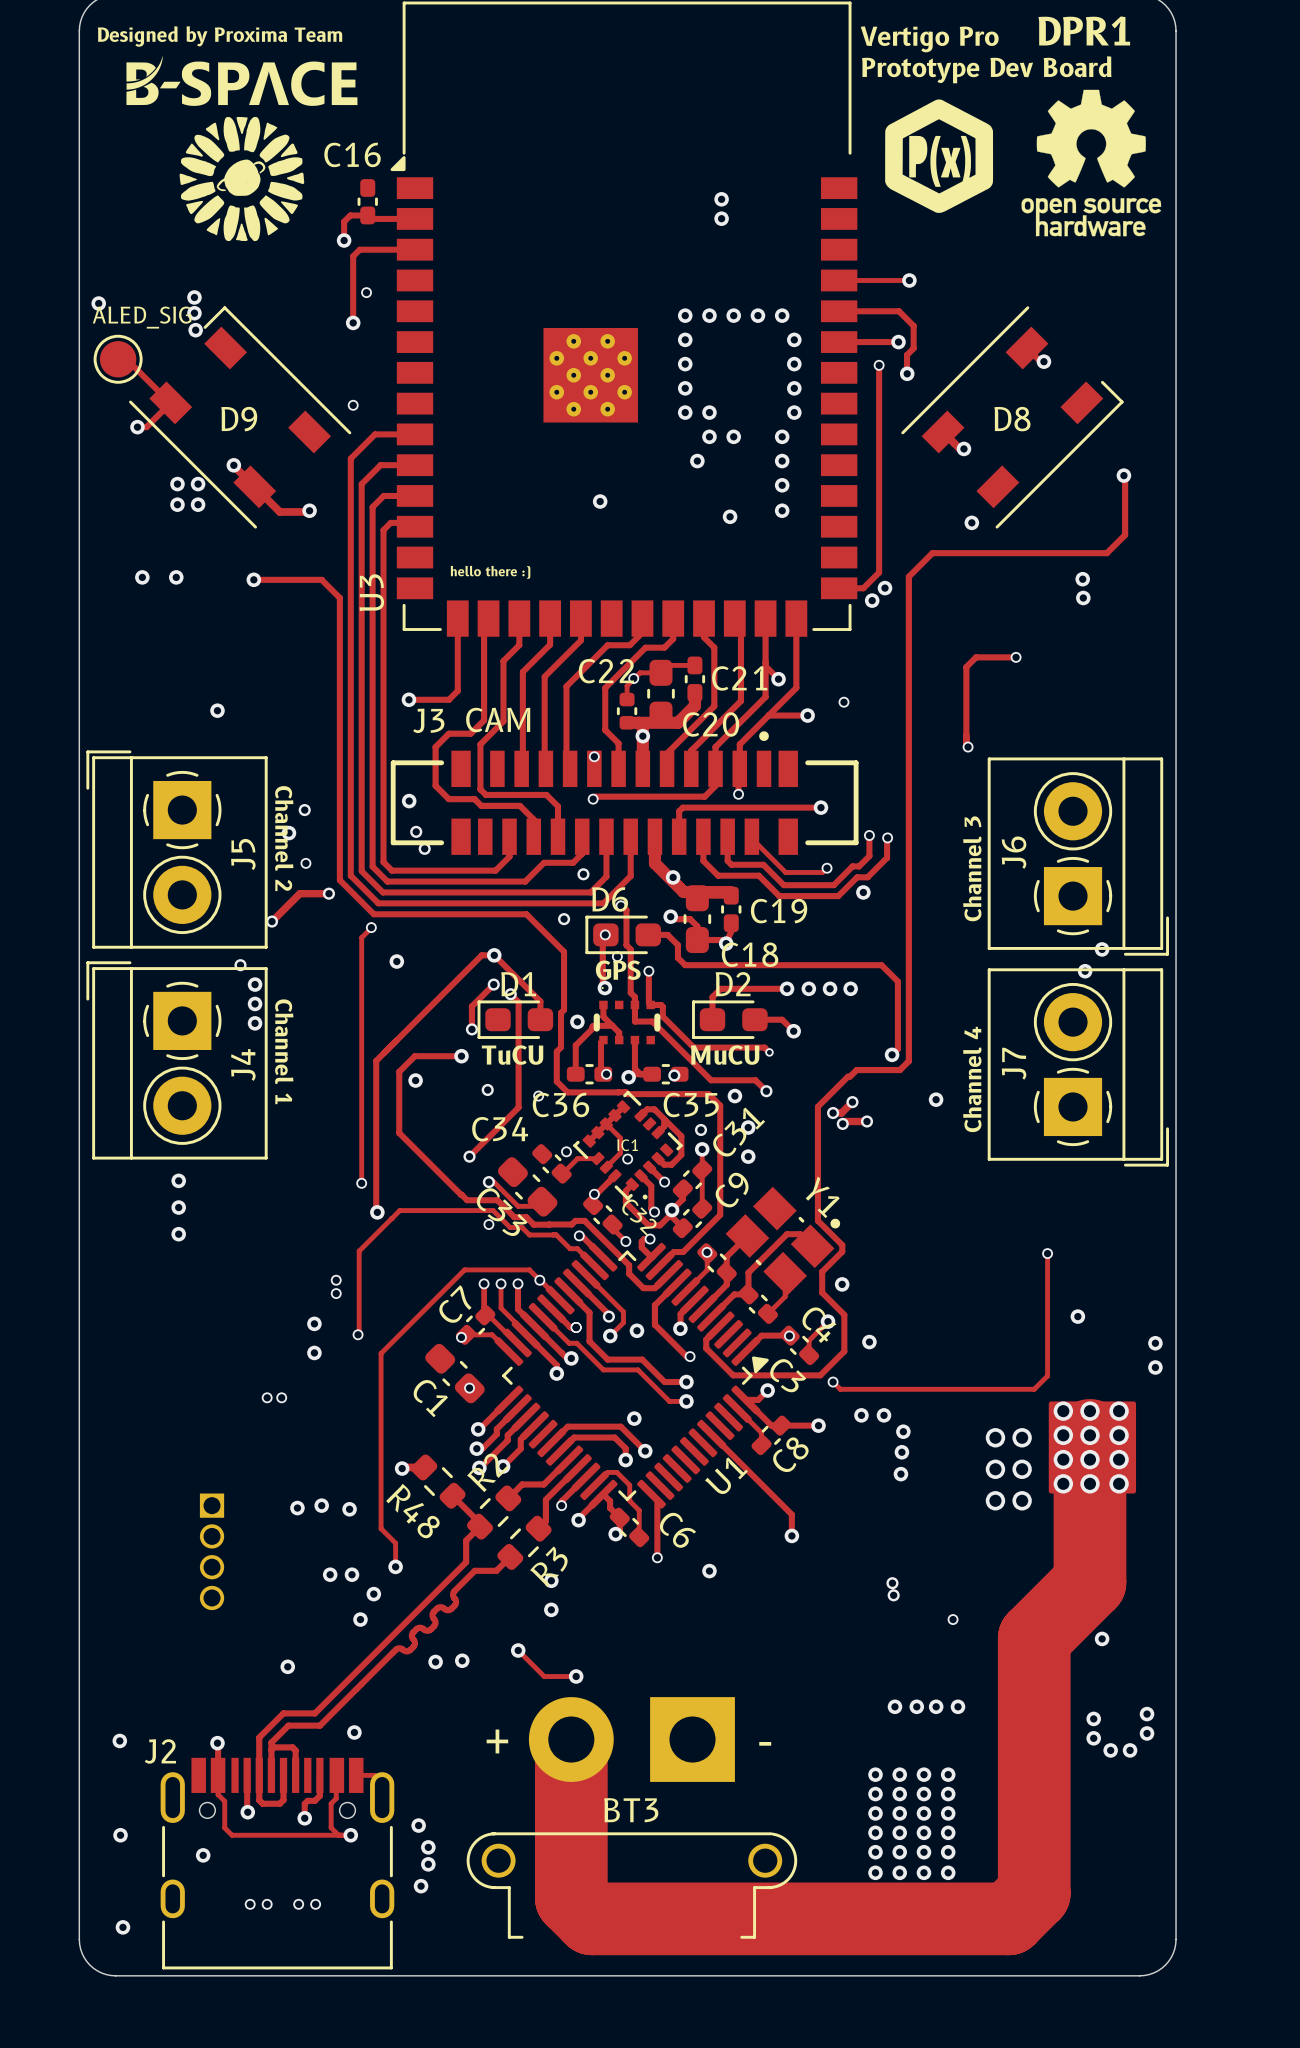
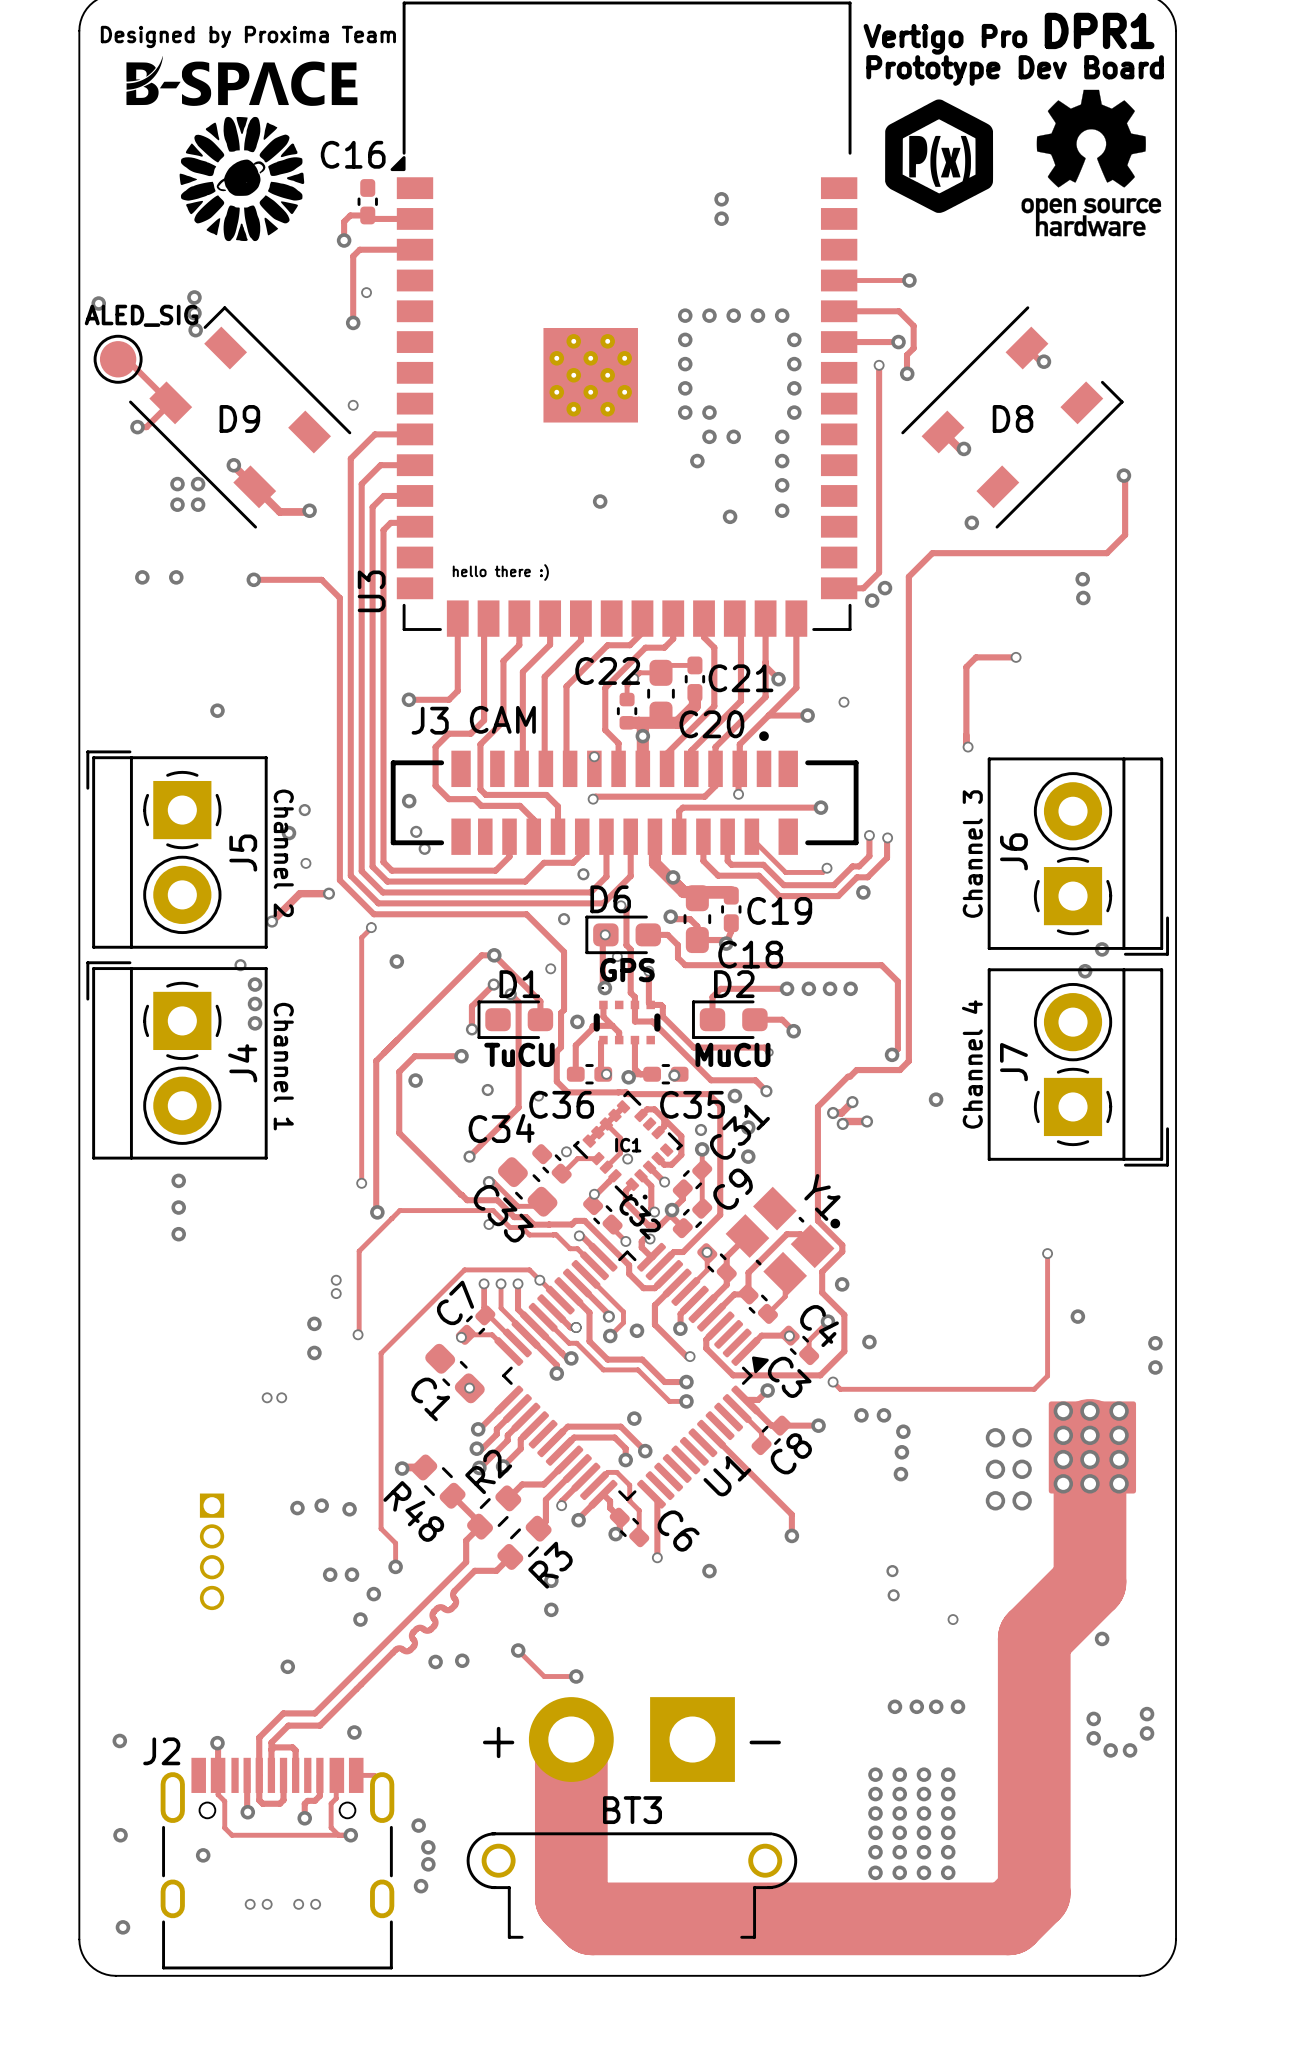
via: none -> (550, 968)
via position: (892, 1583) -> (892, 1571)

